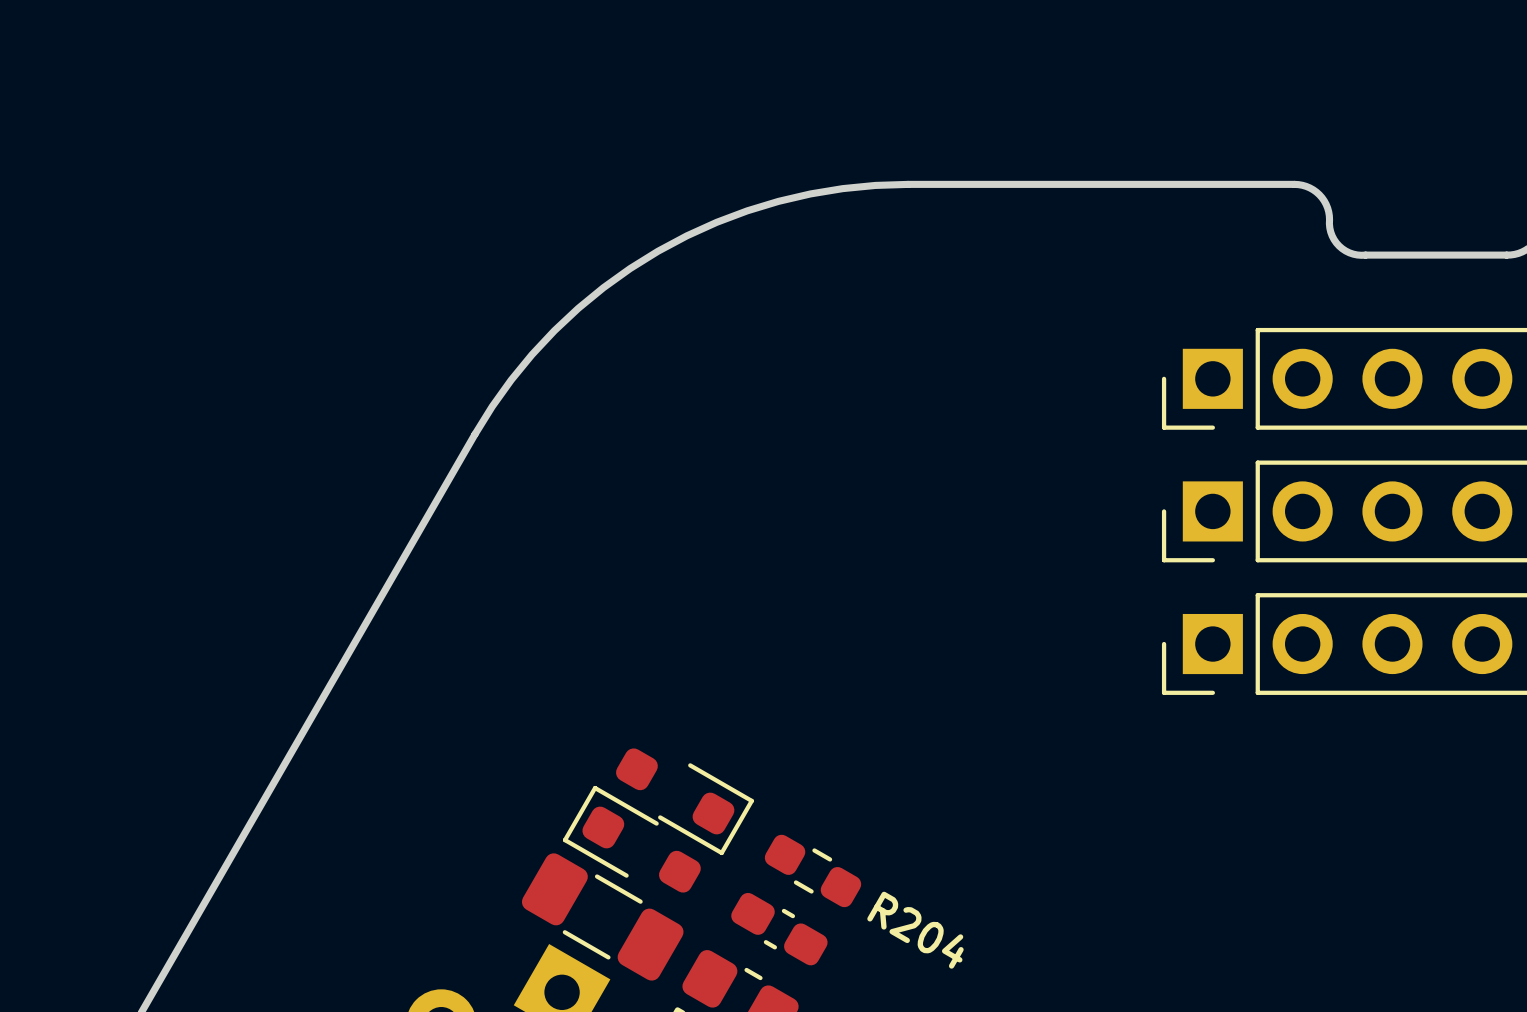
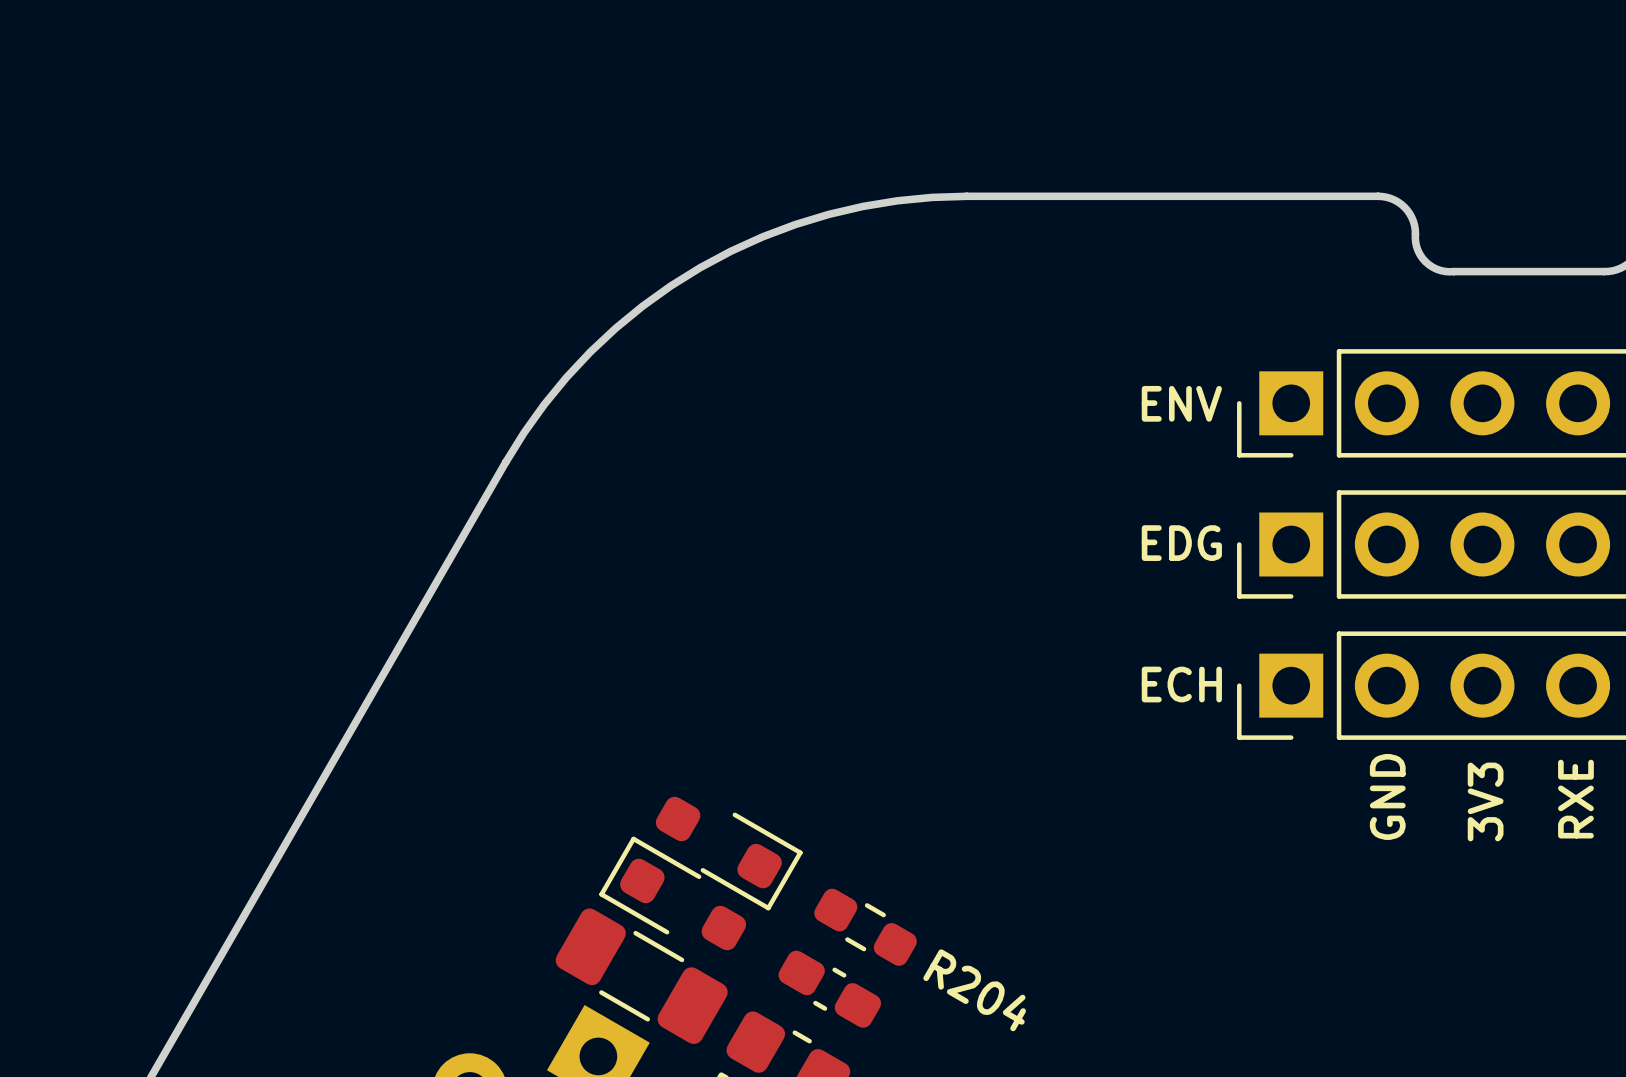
part text: none -> ENV (1181, 403)
part text: none -> EDG (1181, 543)
part text: none -> ECH (1181, 684)
part text: none -> GND (1387, 796)
part text: none -> RXE (1575, 799)
part text: none -> 3V3 (1485, 801)

